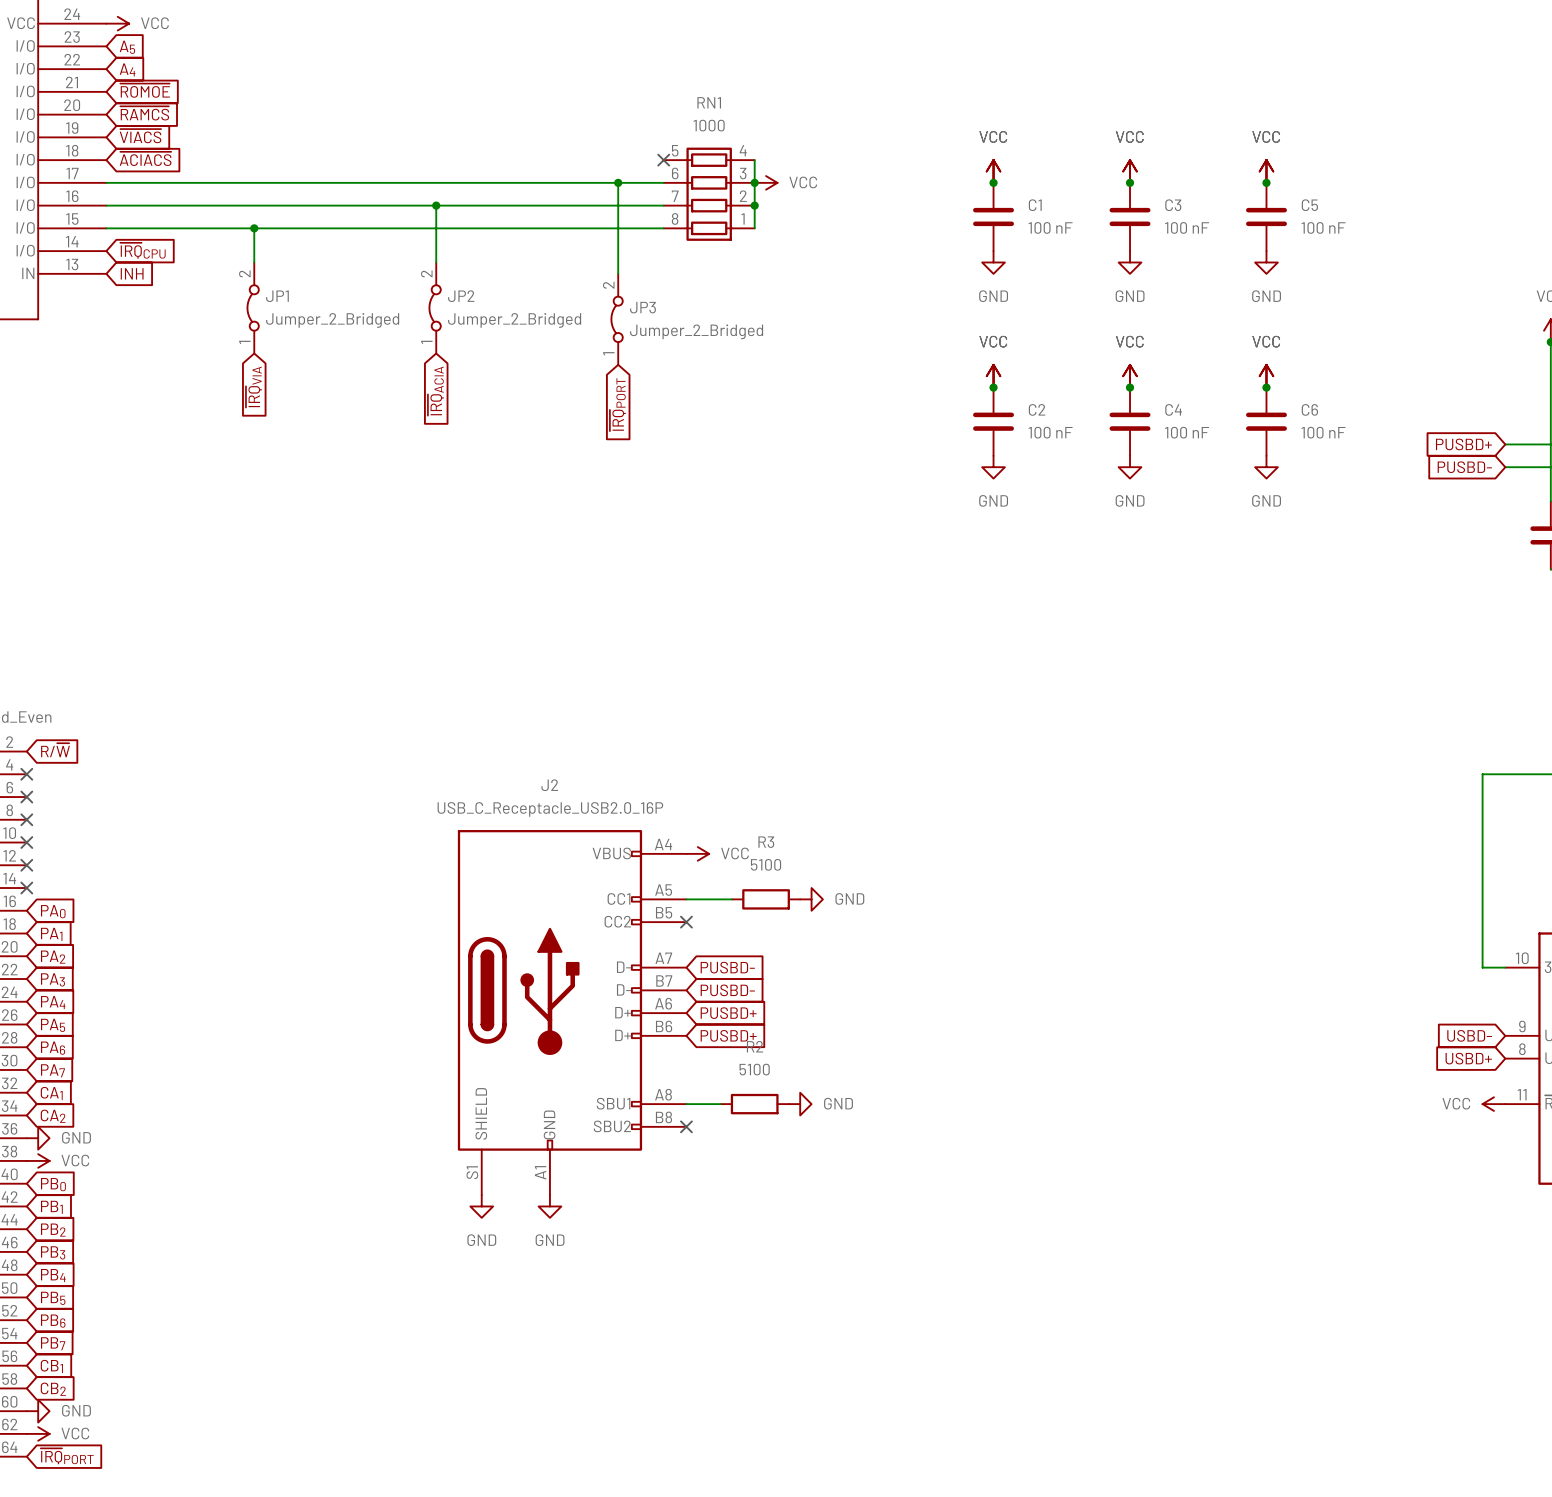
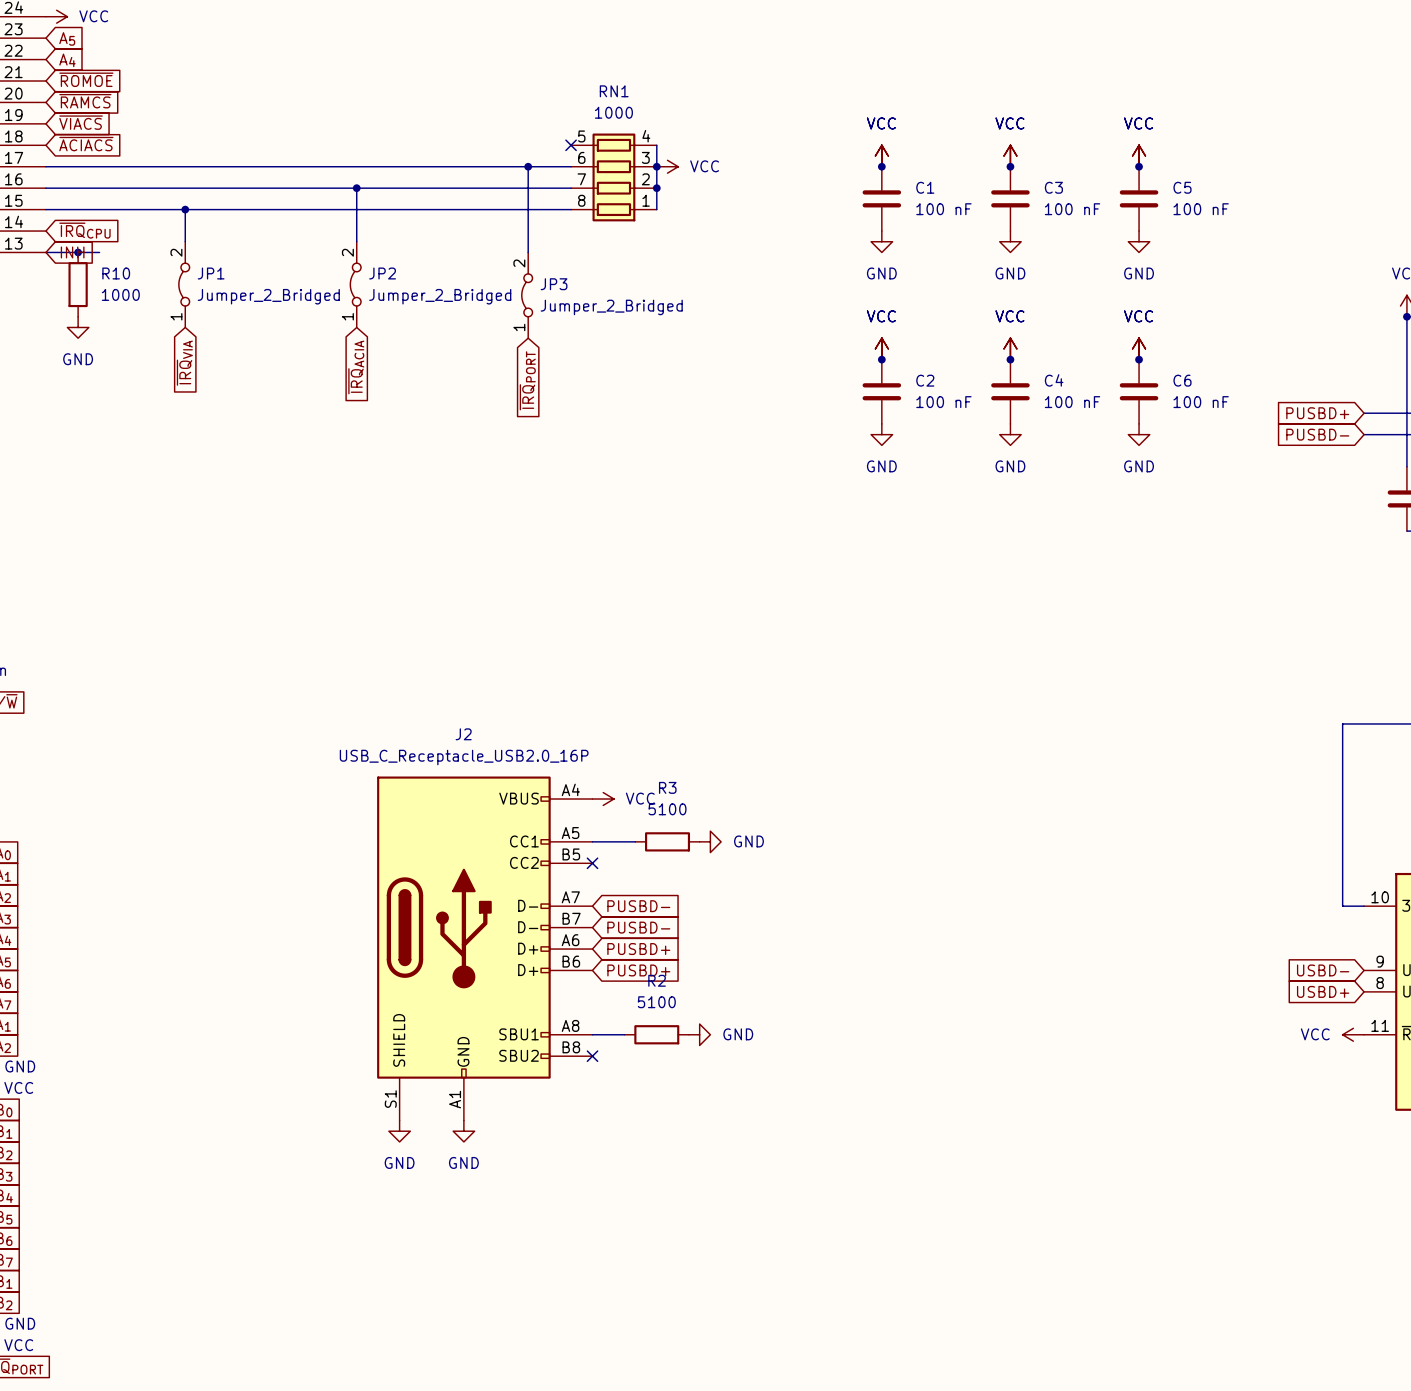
wire: none -> (45, 252) (99, 252)
junction: none -> (78, 252)
R10: none -> 1000 (78, 284)
power symbol: none -> GND (78, 327)

